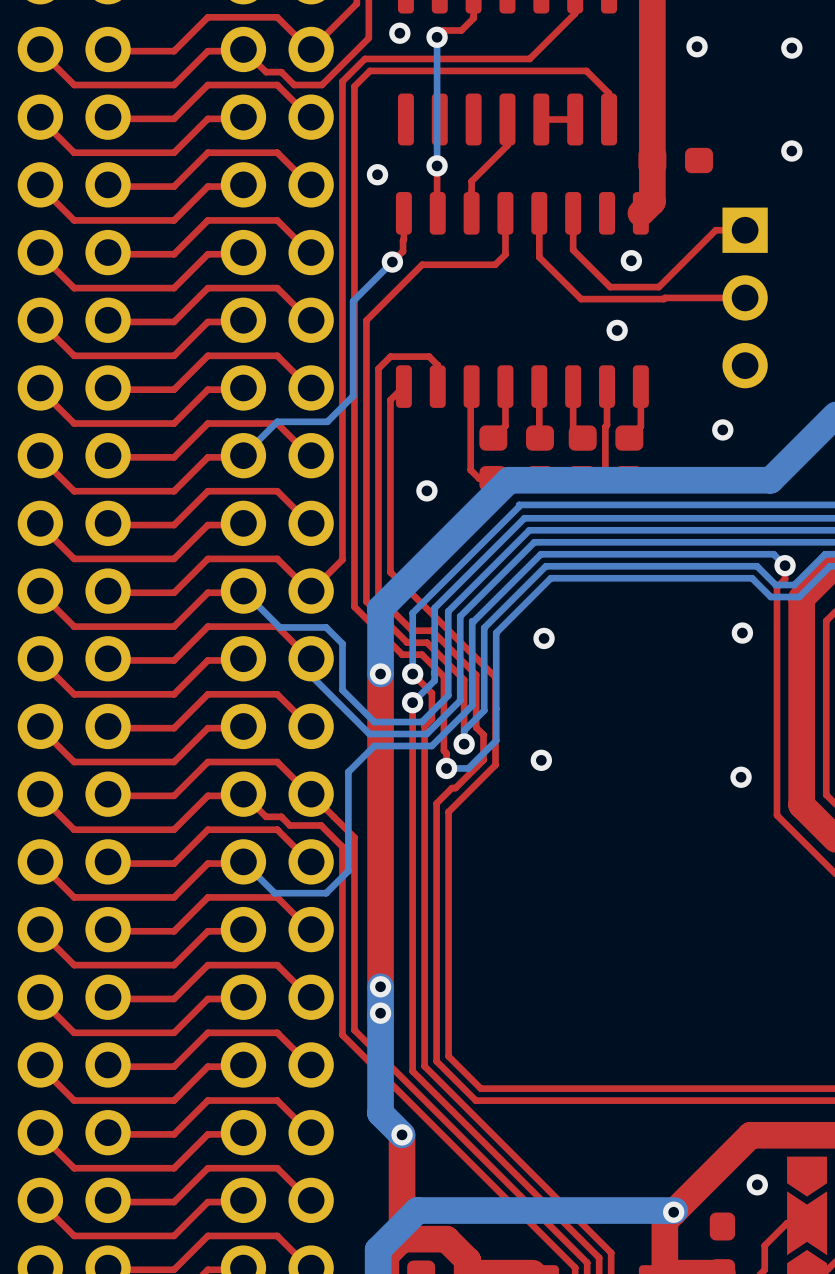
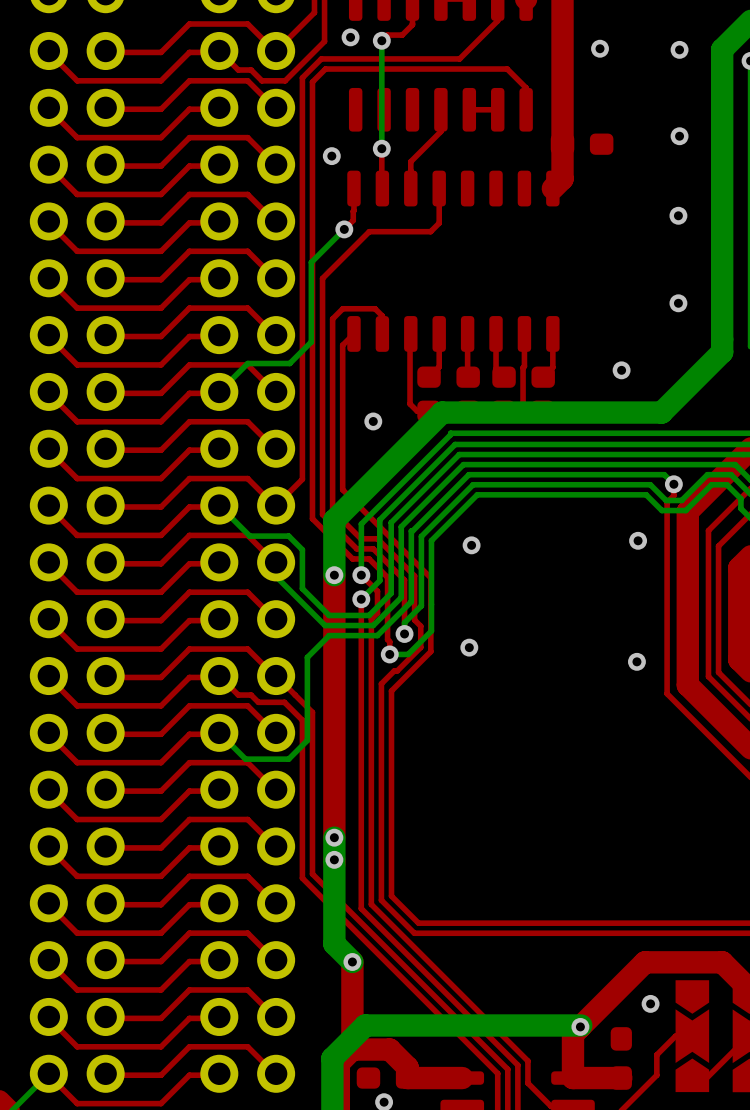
top track: (539, 213) (539, 257) (581, 299) (745, 297) -> none
top track: (573, 213) (573, 250) (610, 287) (658, 287) (715, 230) (745, 230) -> none
via: none -> (678, 215)
via: (631, 260) -> none
part: (745, 297) -> none
via: (617, 330) -> none
via: none -> (678, 303)

